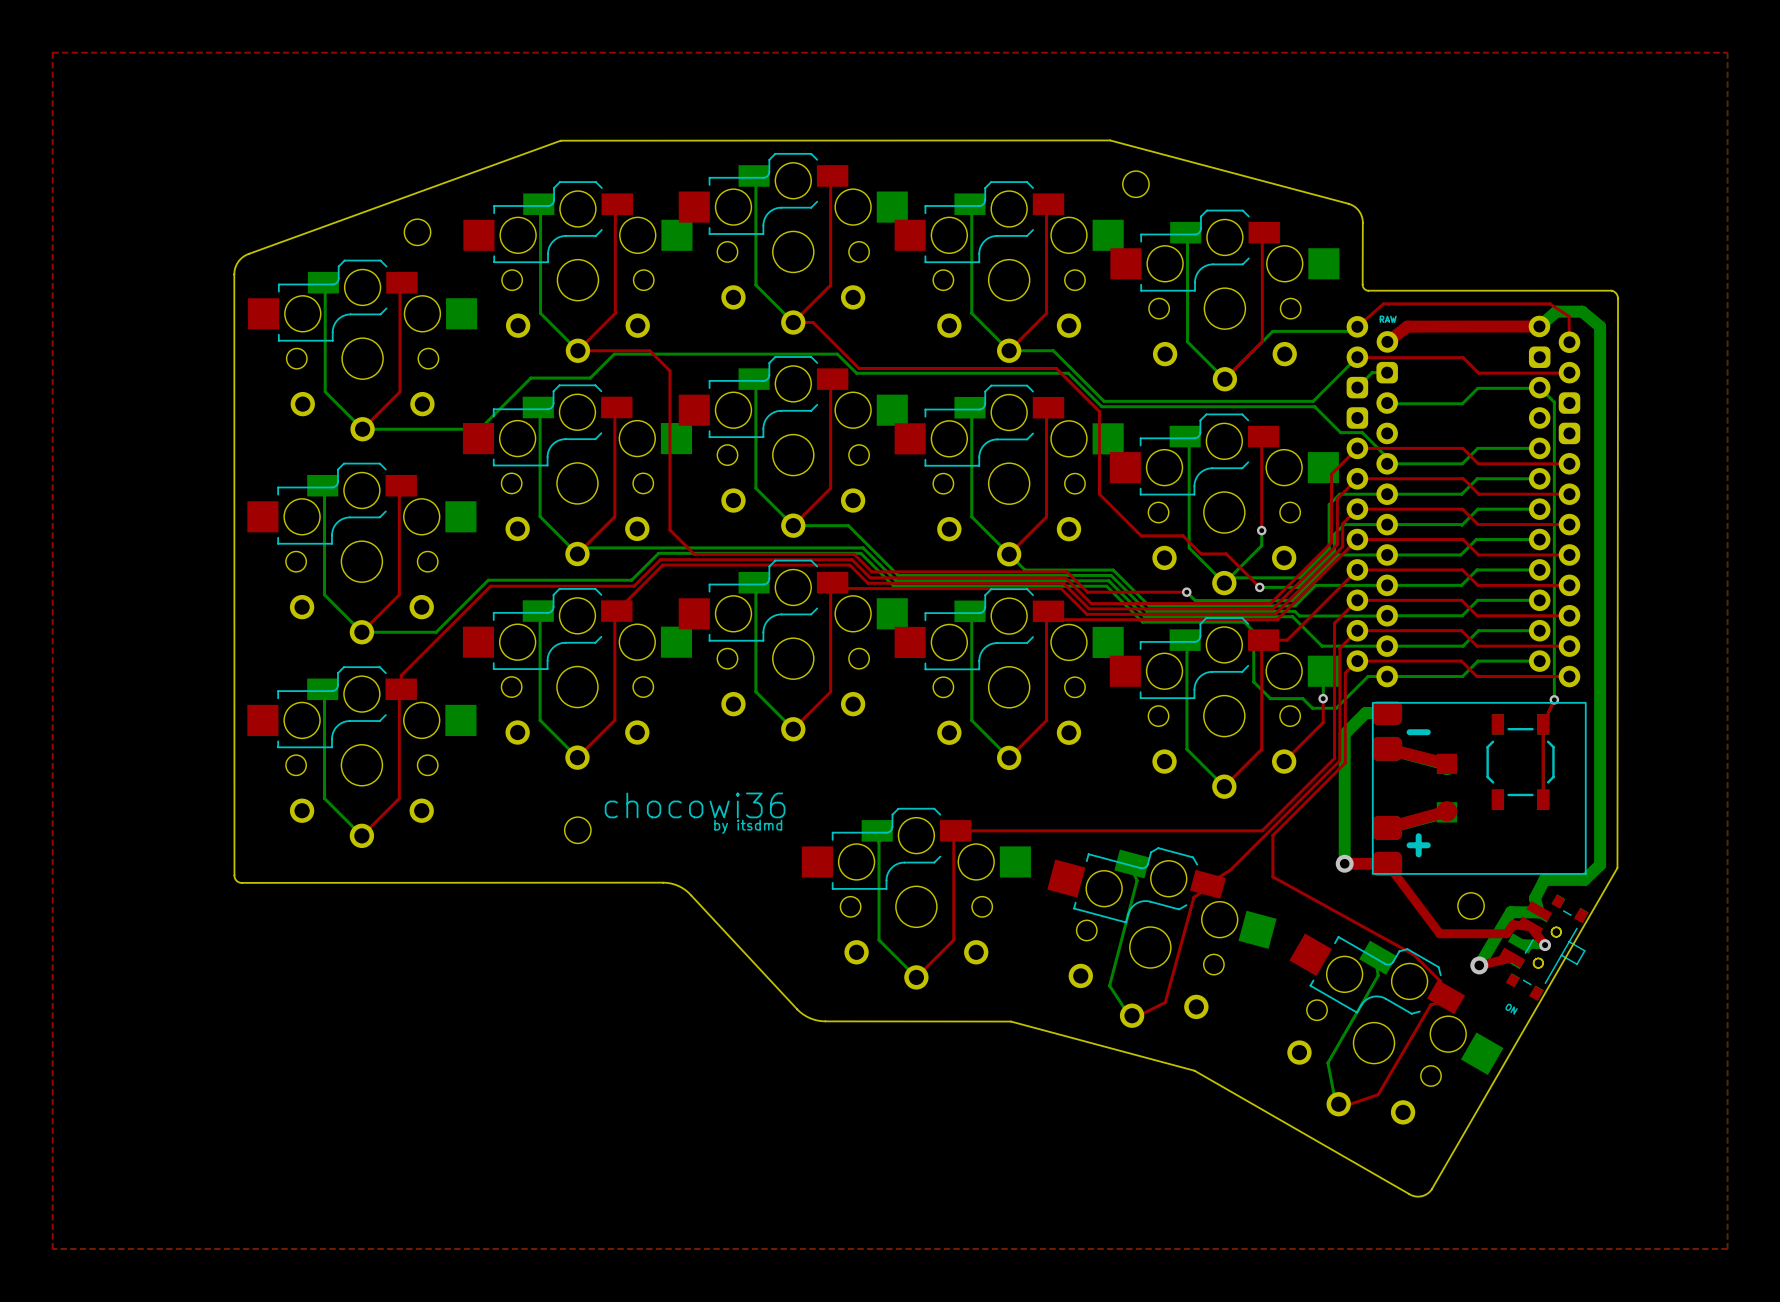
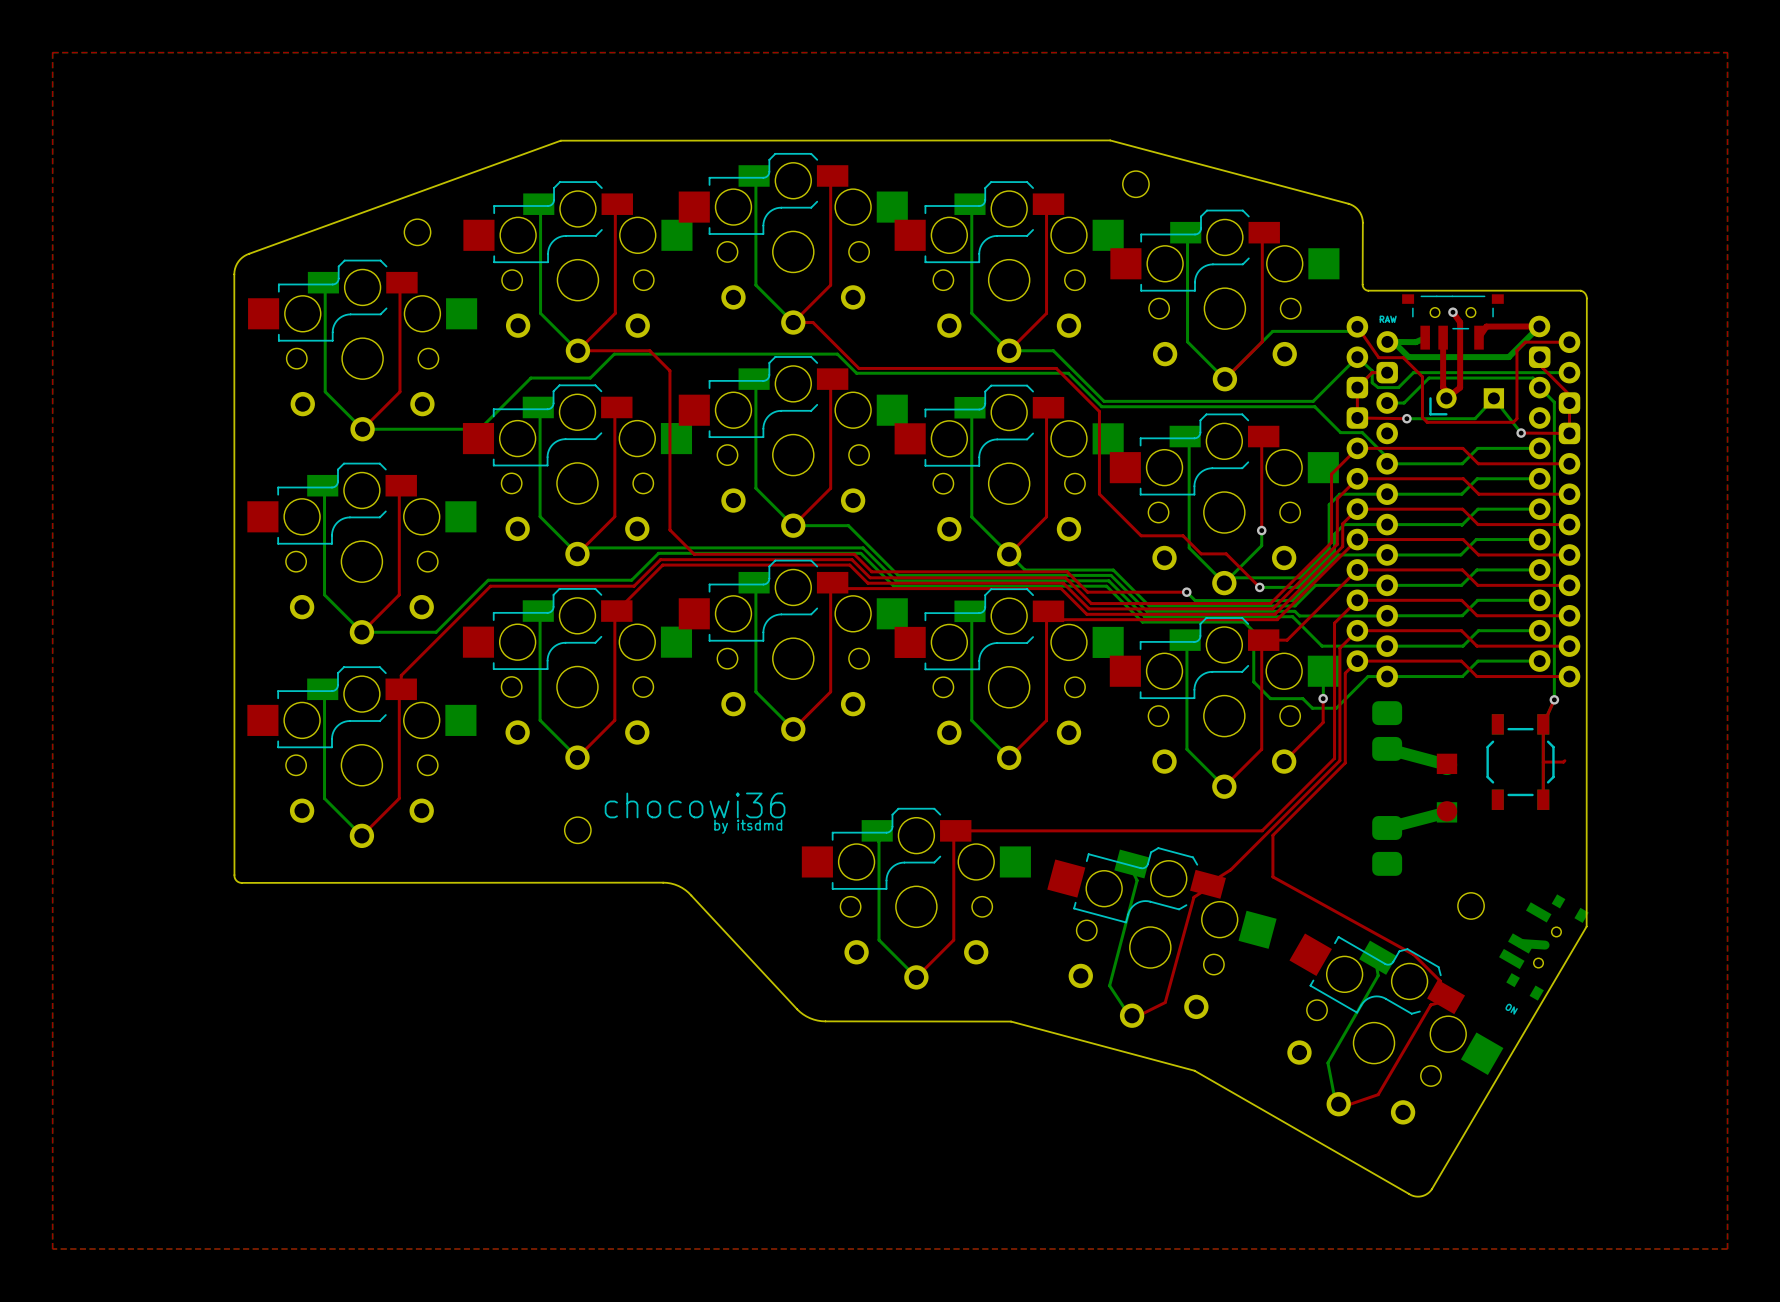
board edge: (1580, 290) (1611, 290) (1616, 293) (1618, 298) (1617, 867) (1431, 1189) -> (1580, 290) (1585, 293) (1586, 298) (1586, 926) (1431, 1189)
top track: none -> (1452, 312) (1460, 322) (1460, 387) (1446, 398)
via: none -> (1452, 312)
part: none -> (1452, 321)
top track: (1357, 326) (1383, 303) (1549, 303) (1569, 316) (1569, 342) -> none
top track: (1539, 326) (1407, 326) (1387, 341) -> (1539, 326) (1486, 326) (1479, 337)
bottom track: (1539, 326) (1556, 311) (1582, 311) (1600, 326) (1600, 864) (1584, 879) (1544, 879) (1534, 898) (1538, 912) (1510, 912) (1479, 965) -> (1539, 326) (1508, 357) (1408, 357) (1393, 341) (1387, 341) (1415, 342) (1426, 337)
top track: none -> (1443, 337) (1443, 387) (1453, 398)
top track: (1357, 357) (1378, 357) -> (1357, 326) (1378, 357)
bottom track: none -> (1357, 357) (1372, 370) (1372, 382) (1378, 387) (1398, 387) (1413, 372) (1569, 372)
top track: (1403, 357) (1463, 357) (1478, 373) (1569, 373) -> (1403, 357) (1422, 376) (1422, 417) (1427, 422) (1513, 422) (1516, 418) (1516, 350) (1525, 342) (1569, 342)
top track: none -> (1542, 358) (1542, 367) (1569, 394) (1569, 404)
top track: none -> (1387, 372) (1372, 372) (1357, 387) (1357, 417) (1406, 418)
bottom track: none -> (1542, 387) (1533, 378) (1429, 378) (1404, 403) (1387, 403)
bottom track: (1539, 388) (1477, 388) (1462, 403) (1387, 403) -> none
part: none -> (1466, 401)
top track: none -> (1569, 404) (1569, 433) (1521, 433)
bottom track: none -> (1406, 418) (1475, 418) (1493, 398) (1521, 433)
via: none -> (1406, 418)
via: none -> (1521, 433)
bottom track: (1387, 713) (1365, 713) (1344, 733) (1344, 863) -> none
top track: (1387, 748) (1446, 763) -> none
top track: none -> (1564, 760) (1543, 762)
part: (1479, 788) -> none
top track: (1446, 811) (1387, 827) -> none
top track: (1344, 863) (1387, 863) (1439, 933) (1506, 933) (1513, 924) (1530, 926) (1545, 945) -> none
via: (1344, 863) -> none
via: (1545, 945) -> none
part: (1544, 947) -> none
top track: (1512, 957) (1479, 965) -> none
via: (1479, 965) -> none

